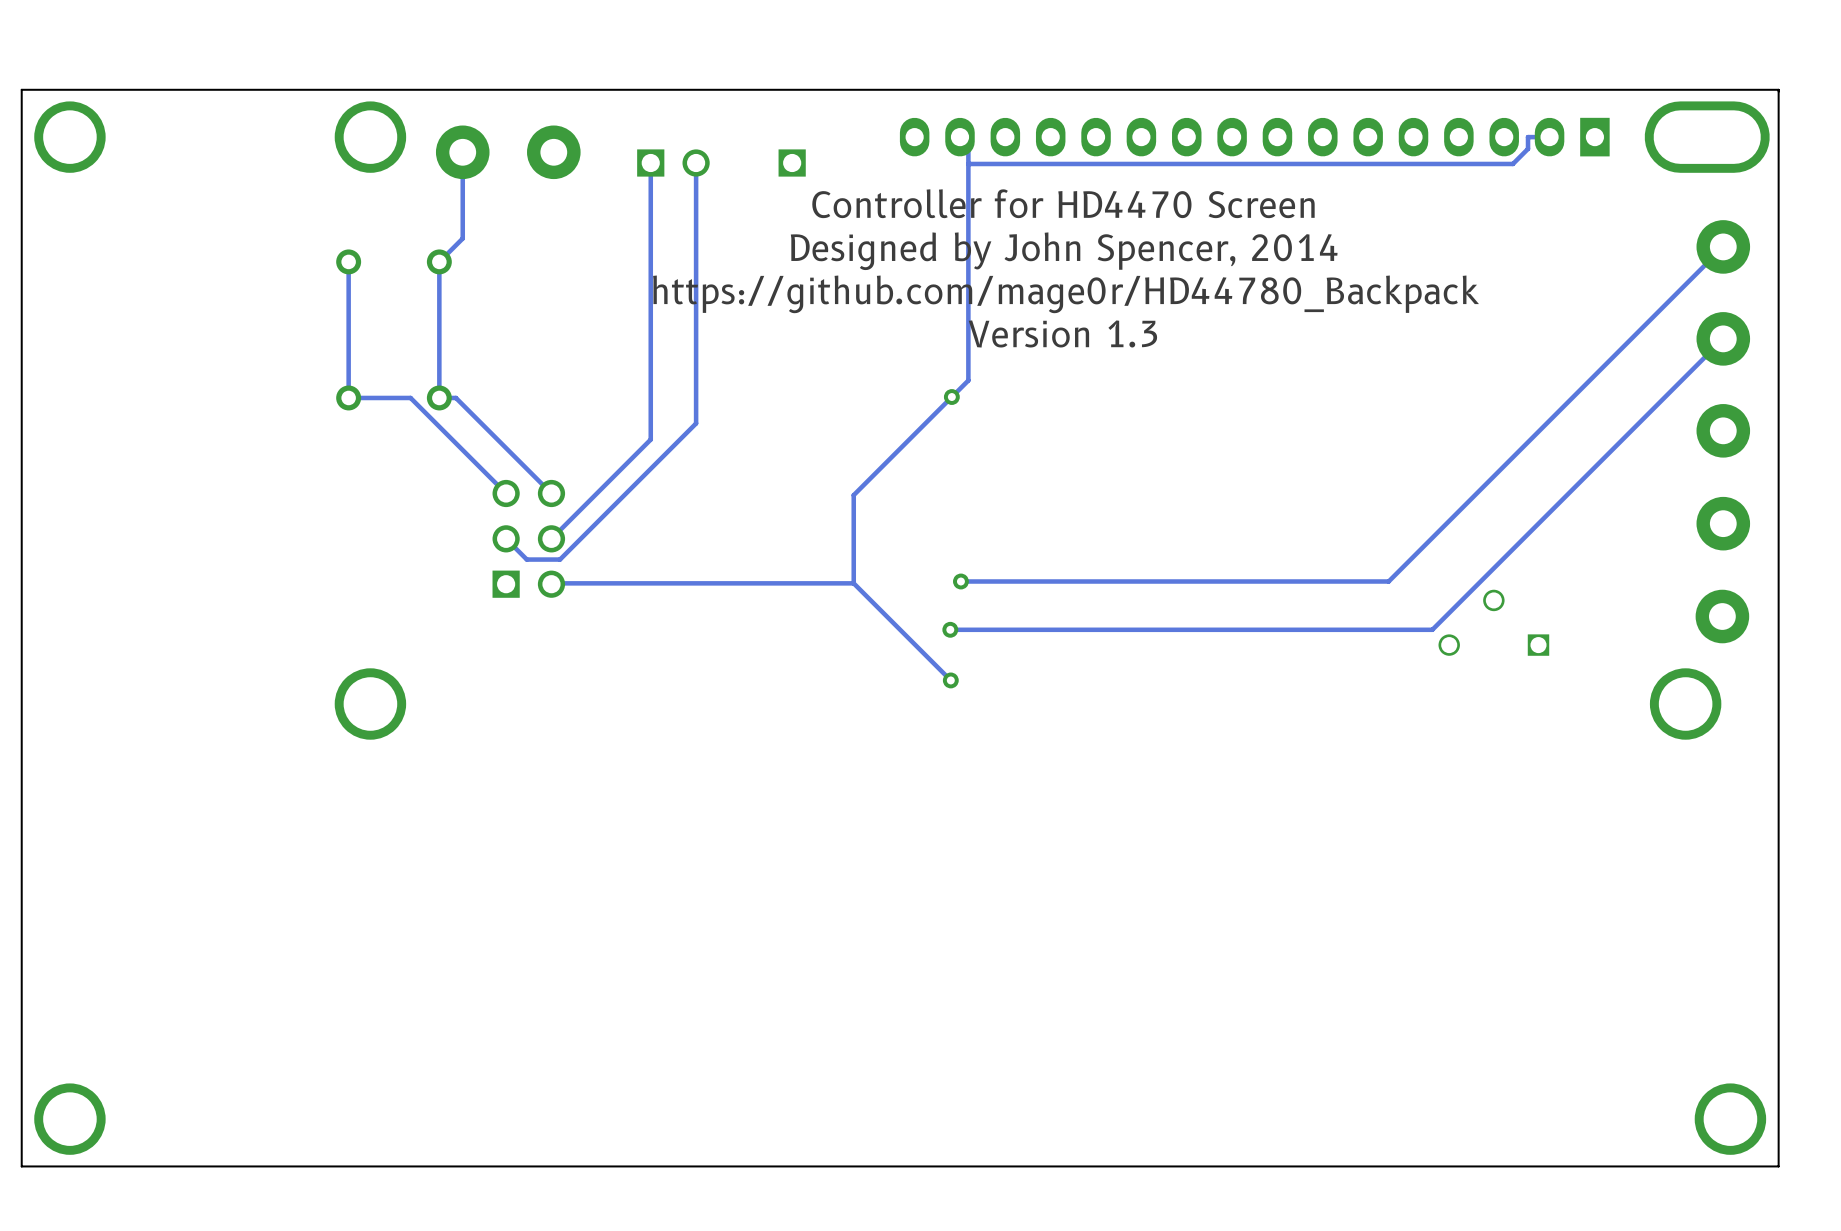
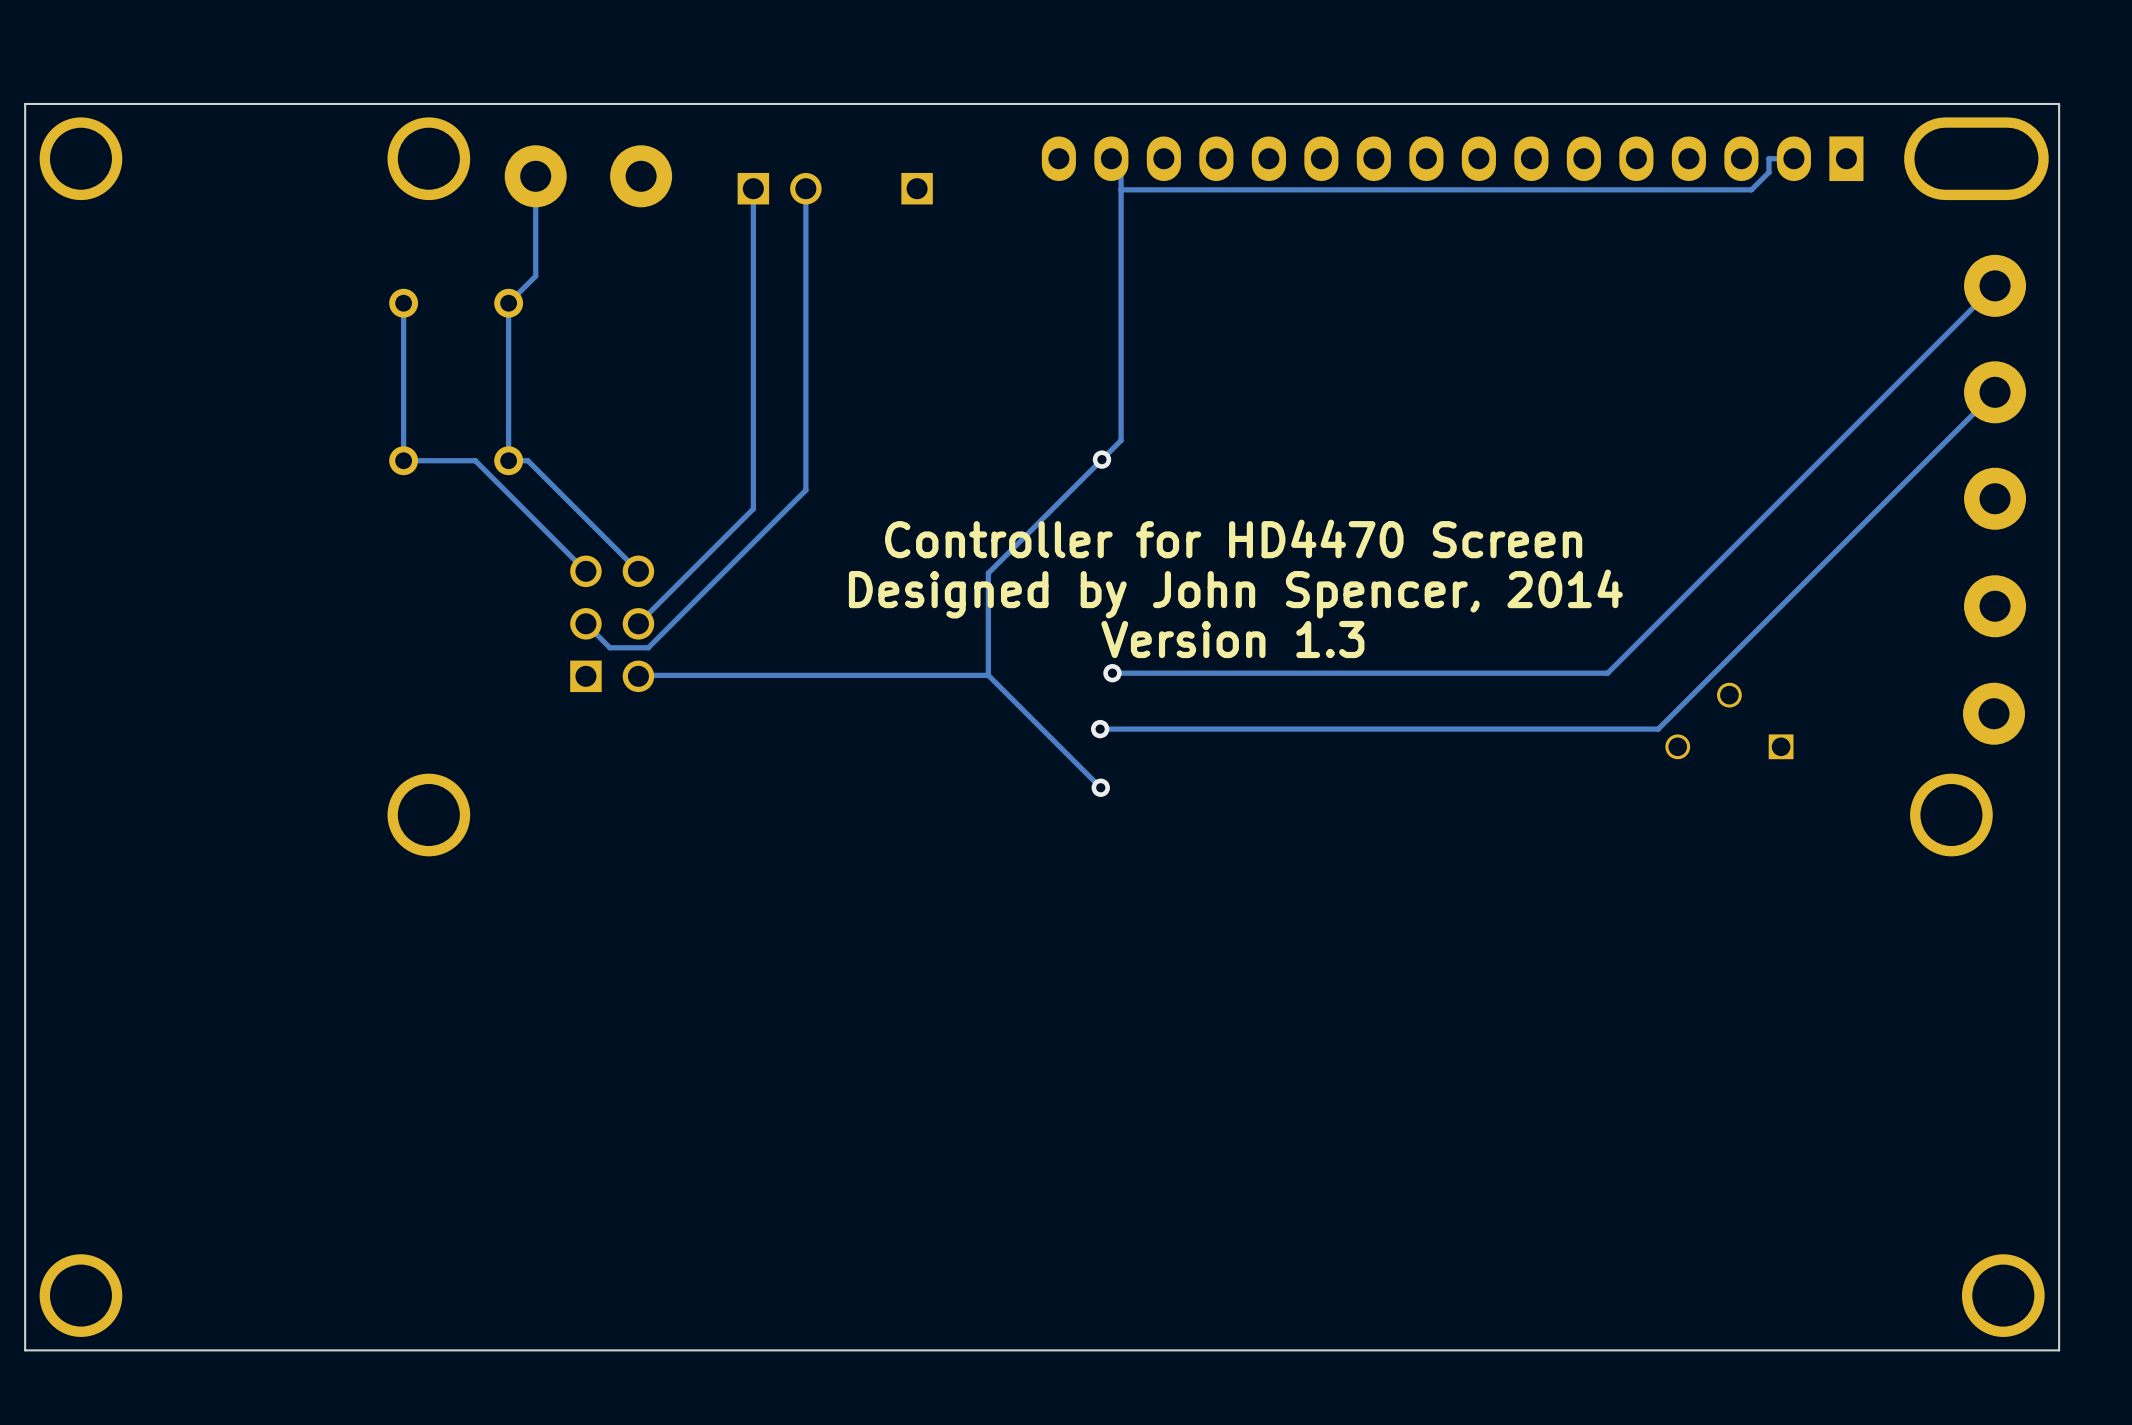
text position: Controller for HD4470 Screen (1063, 203) -> Controller for HD4470 Screen (1233, 538)
text position: Designed by John Spencer, 2014 (1064, 251) -> Designed by John Spencer, 2014 (1235, 594)
text: https://github.com/mage0r/HD44780_Backpack (1066, 294) -> none
text position: Version 1.3 (1062, 333) -> Version 1.3 (1232, 639)

